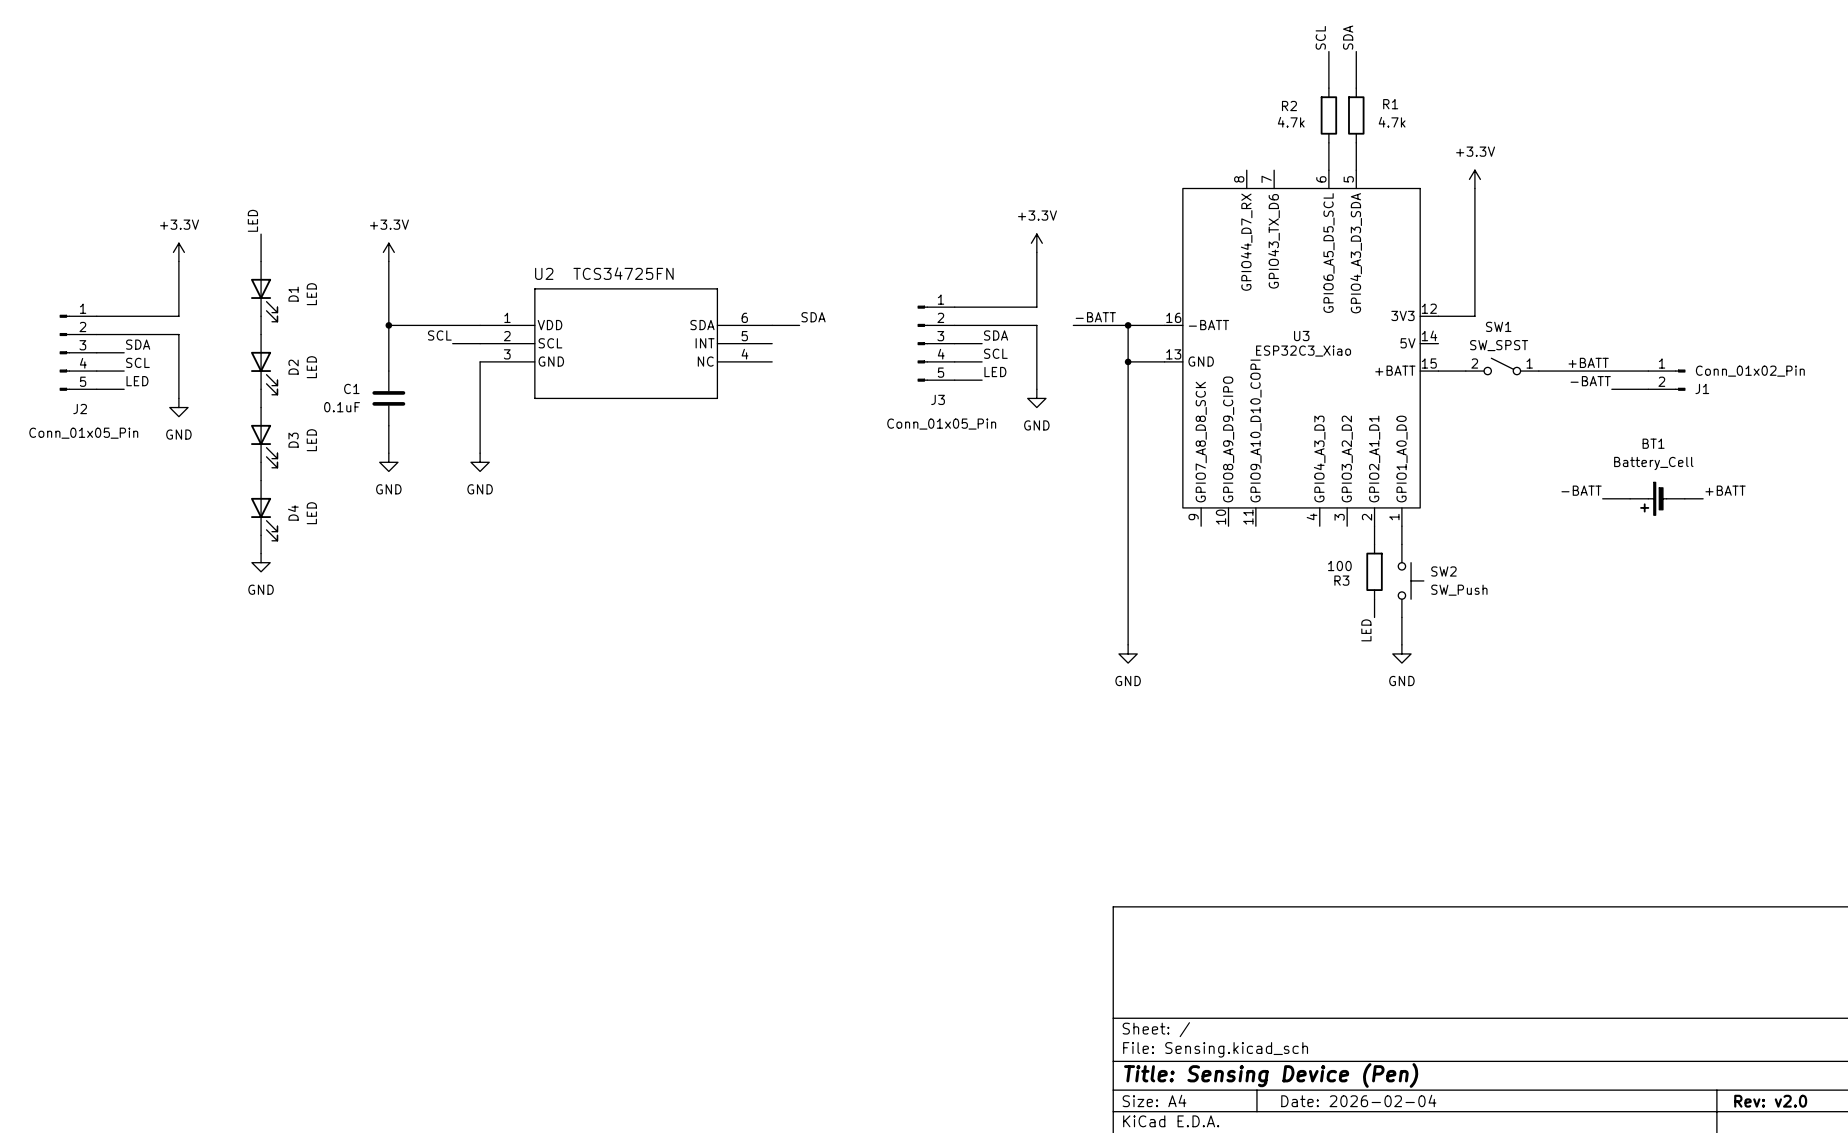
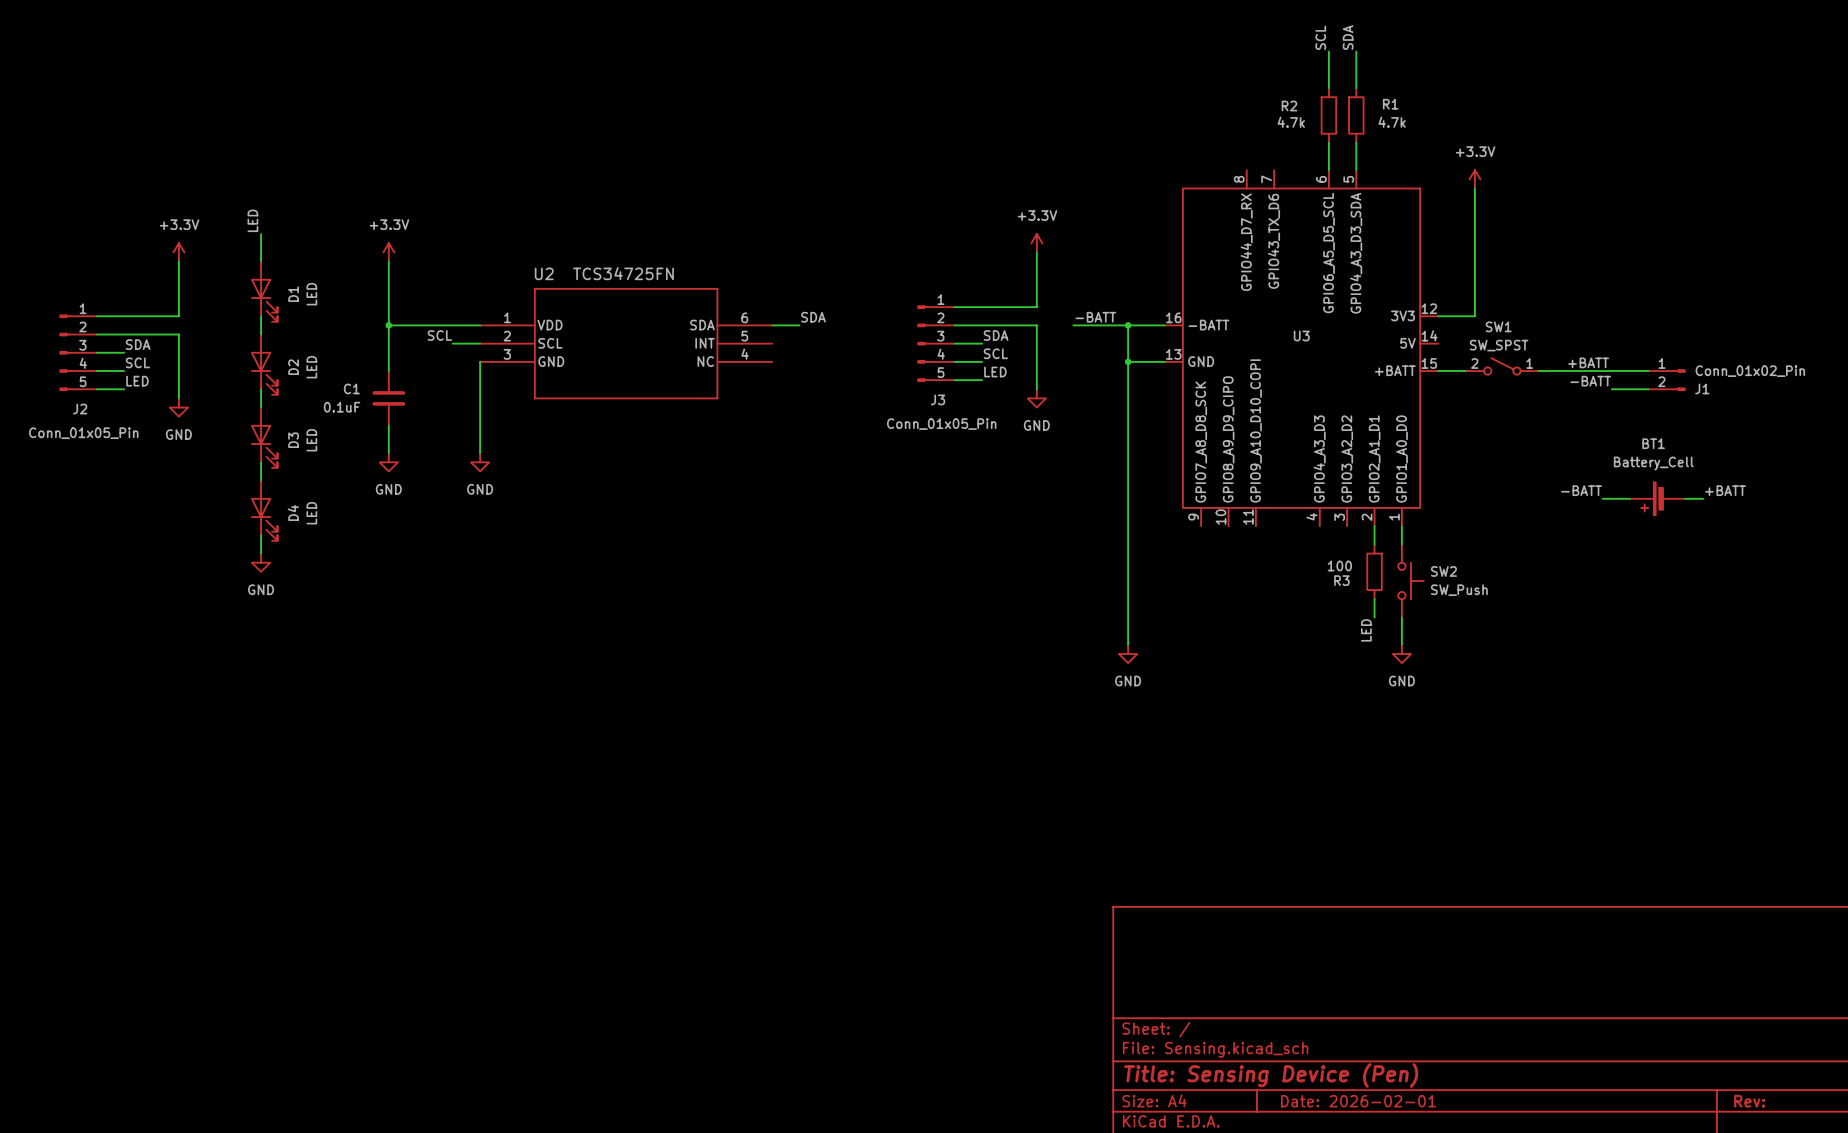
U3 value: ESP32C3_Xiao (1303, 351) -> none
title block: Date: 2026-02-04 (1358, 1100) -> Date: 2026-02-01 (1358, 1101)
title block: Rev: v2.0 (1770, 1101) -> Rev: (1749, 1101)

